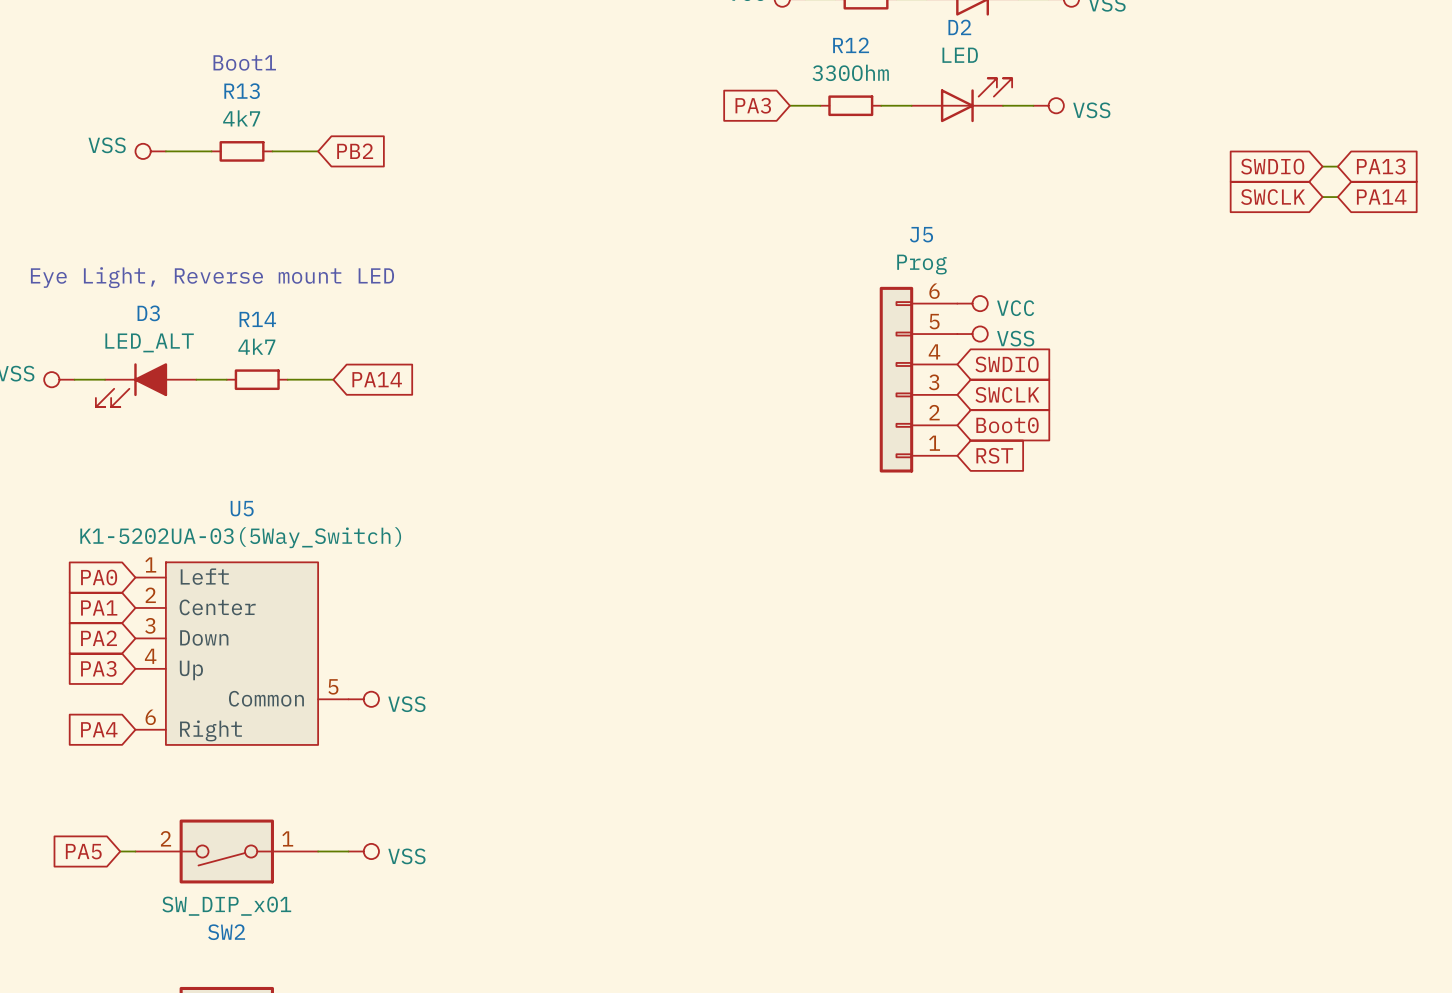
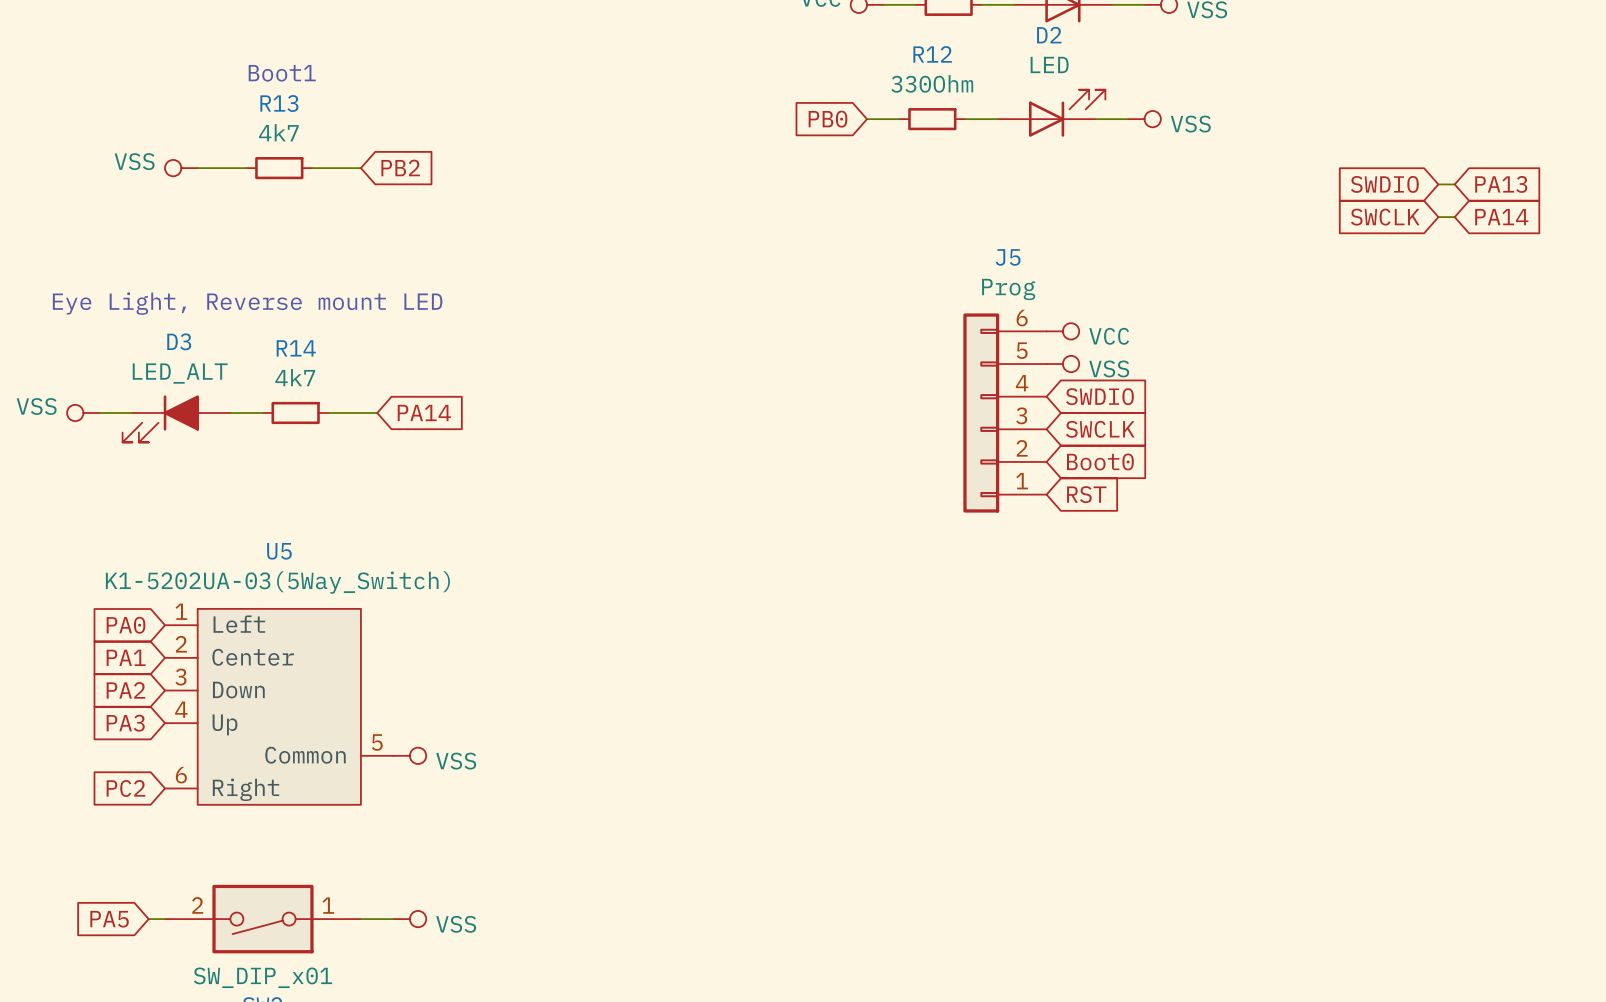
global label: PA3 (753, 105) -> PB0 (828, 119)
global label: PA4 (99, 729) -> PC2 (125, 788)

